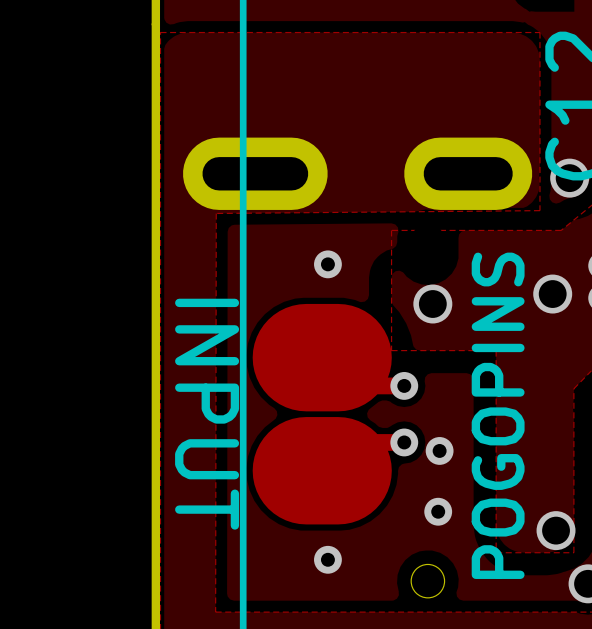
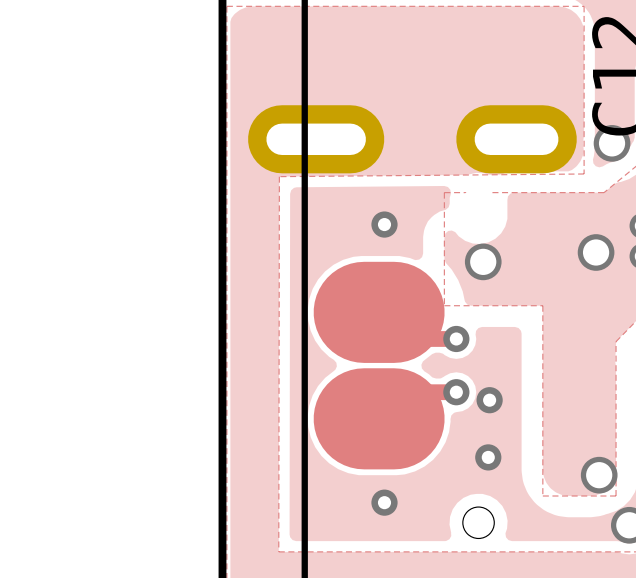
text: INPUT (207, 414) -> none
text: POGOPINS (498, 415) -> none

